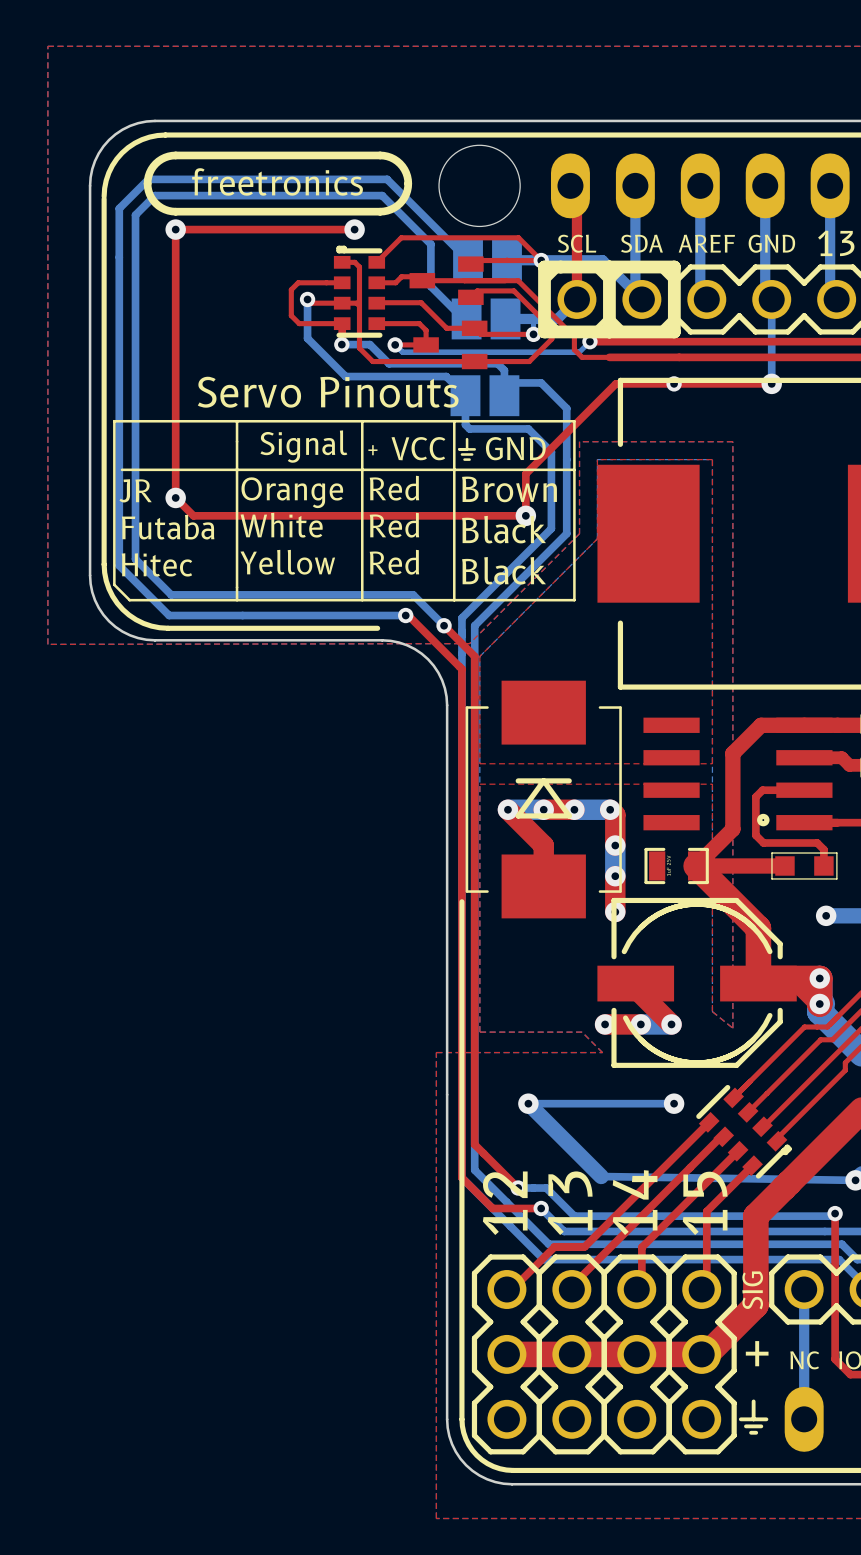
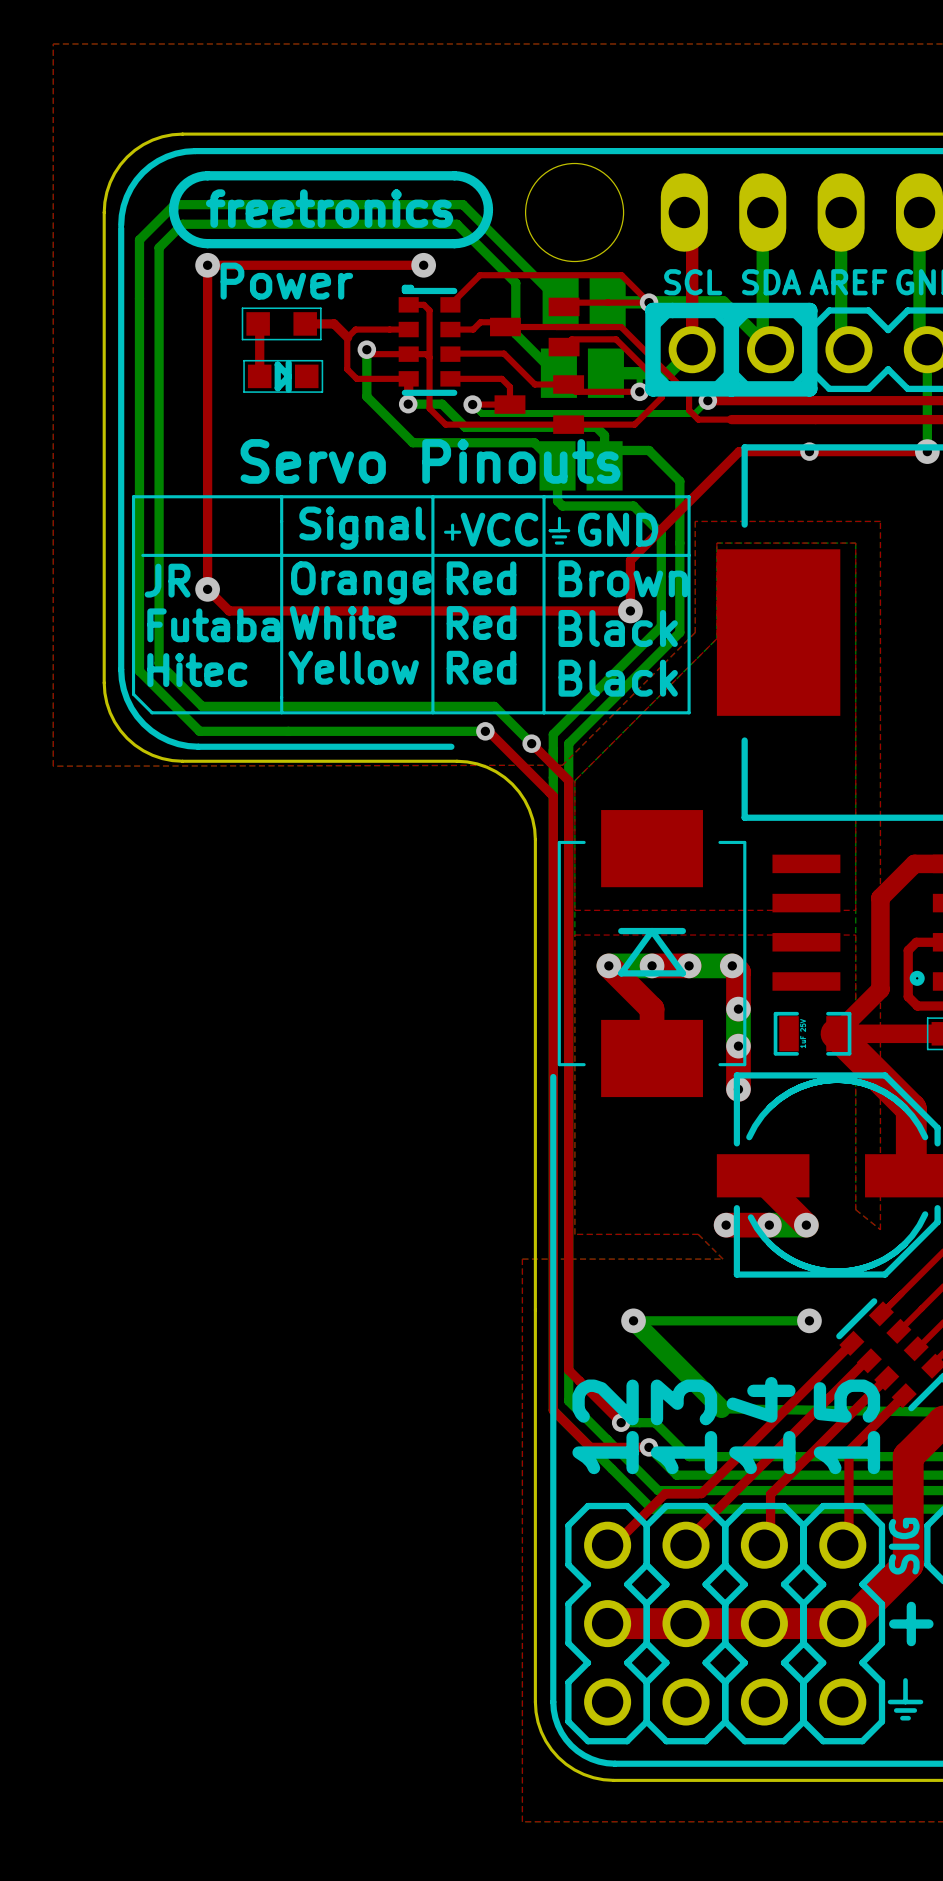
text: none -> Power (286, 281)
top track: none -> (258, 323) (259, 376)
part: none -> (281, 323)
top track: none -> (305, 323) (334, 323) (347, 337)
part: none -> (283, 376)

